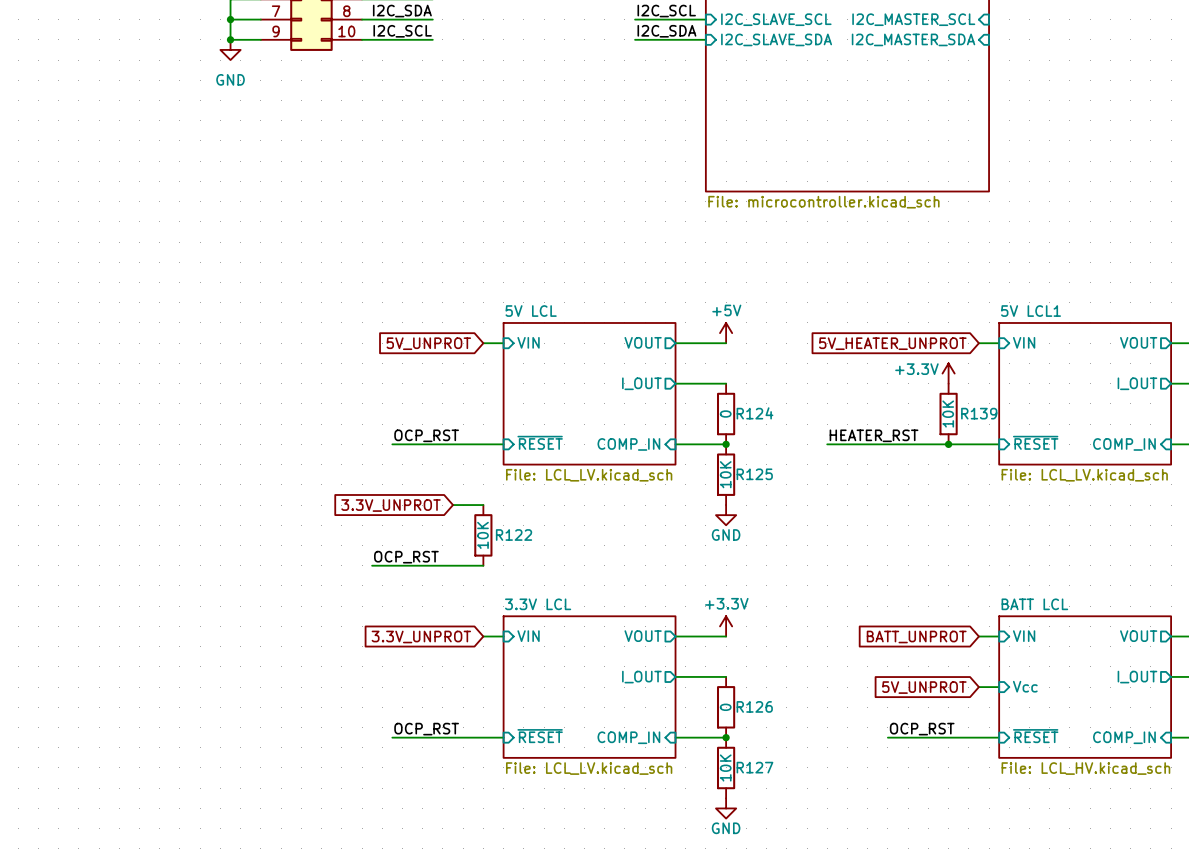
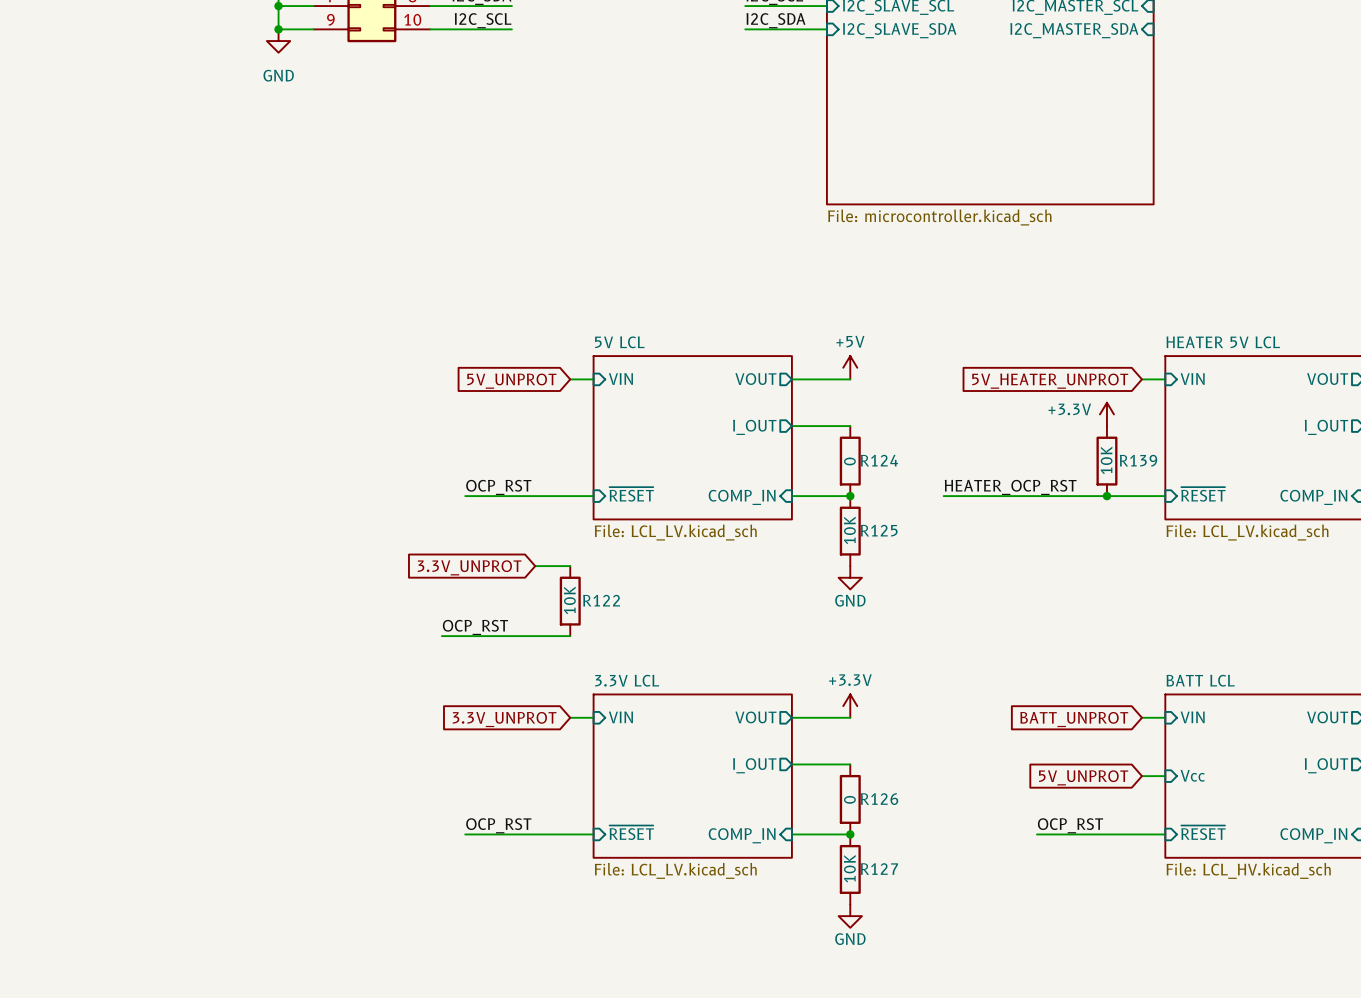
sheet 5V LCL1 name: 5V LCL1 (1031, 311) -> HEATER 5V LCL (1223, 342)
label: HEATER_RST (874, 435) -> HEATER_OCP_RST (1010, 487)
wire: none -> (943, 496) (966, 496)

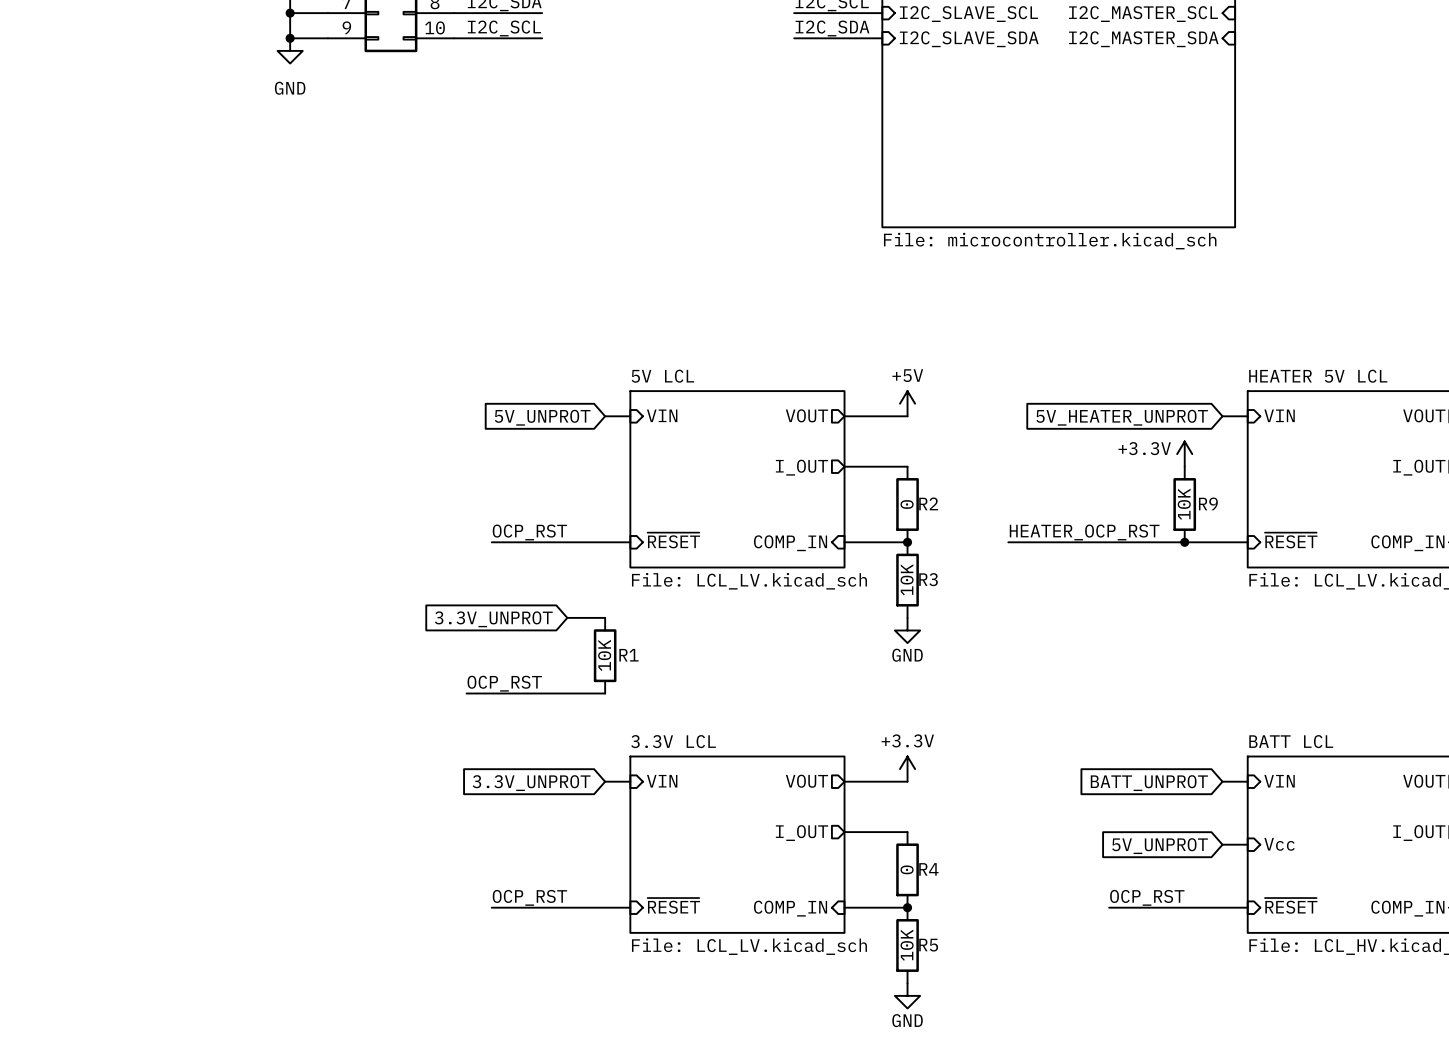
R124 name: R124 (879, 460) -> R2 (928, 503)
R139 name: R139 (1138, 460) -> R9 (1208, 503)
R125 name: R125 (879, 530) -> R3 (928, 579)
R122 name: R122 (601, 600) -> R1 (628, 655)
R126 name: R126 (879, 799) -> R4 (928, 869)
R127 name: R127 (879, 869) -> R5 (928, 945)

